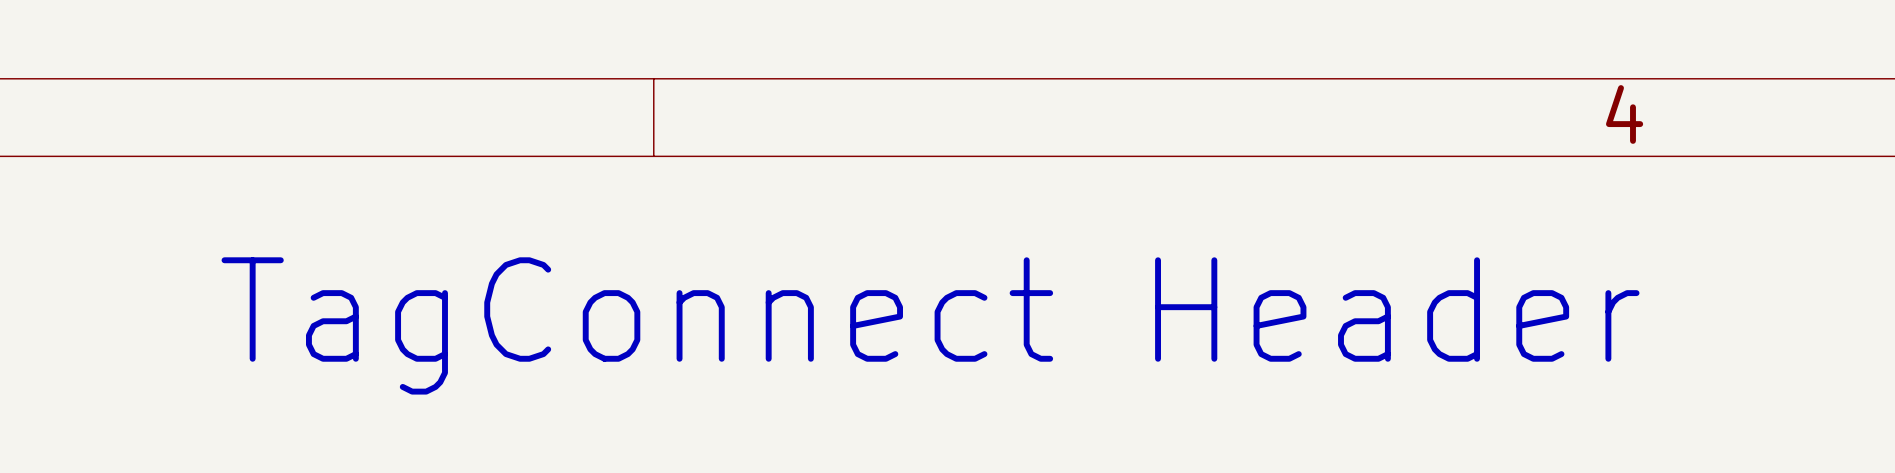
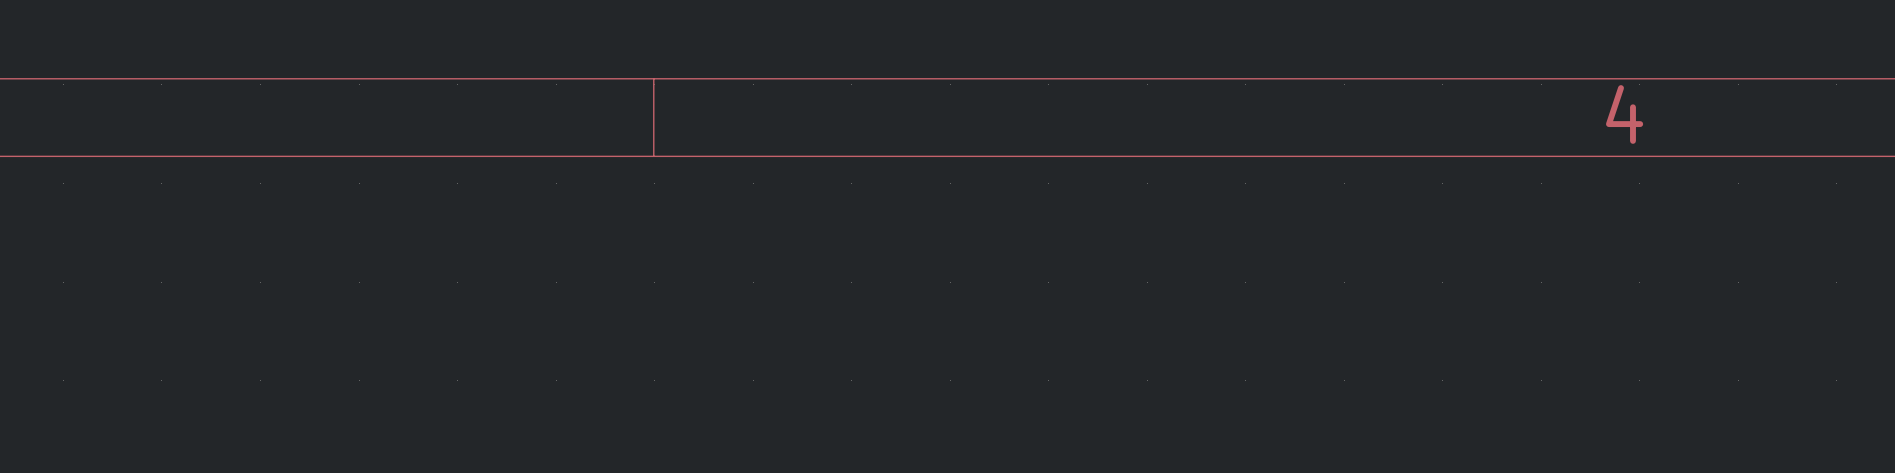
text: TagConnect Header (930, 325) -> none

